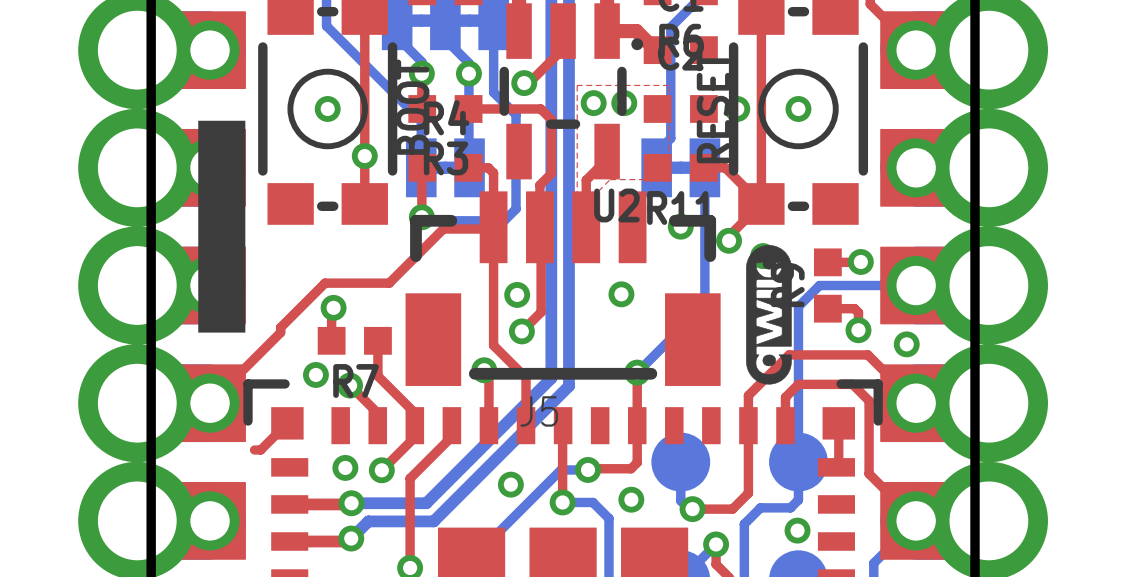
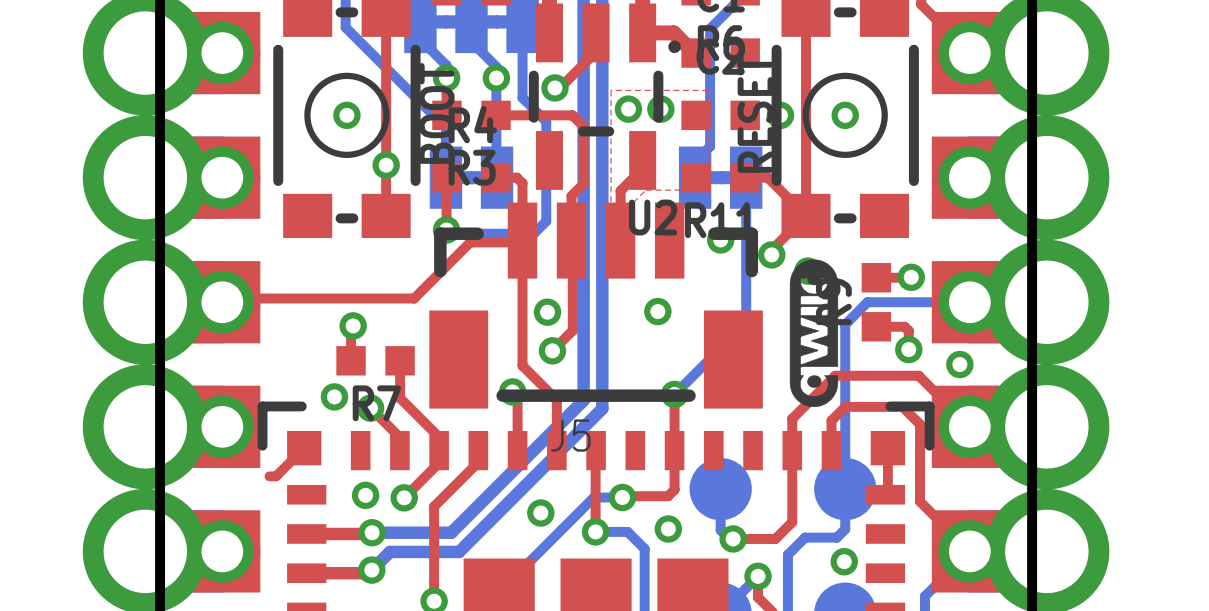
drawing: [198, 120, 246, 333] -> none
top track: (443, 229) (389, 283) (325, 283) (280, 327) (280, 332) (210, 403) -> (470, 242) (414, 298) (226, 298) (222, 302)

